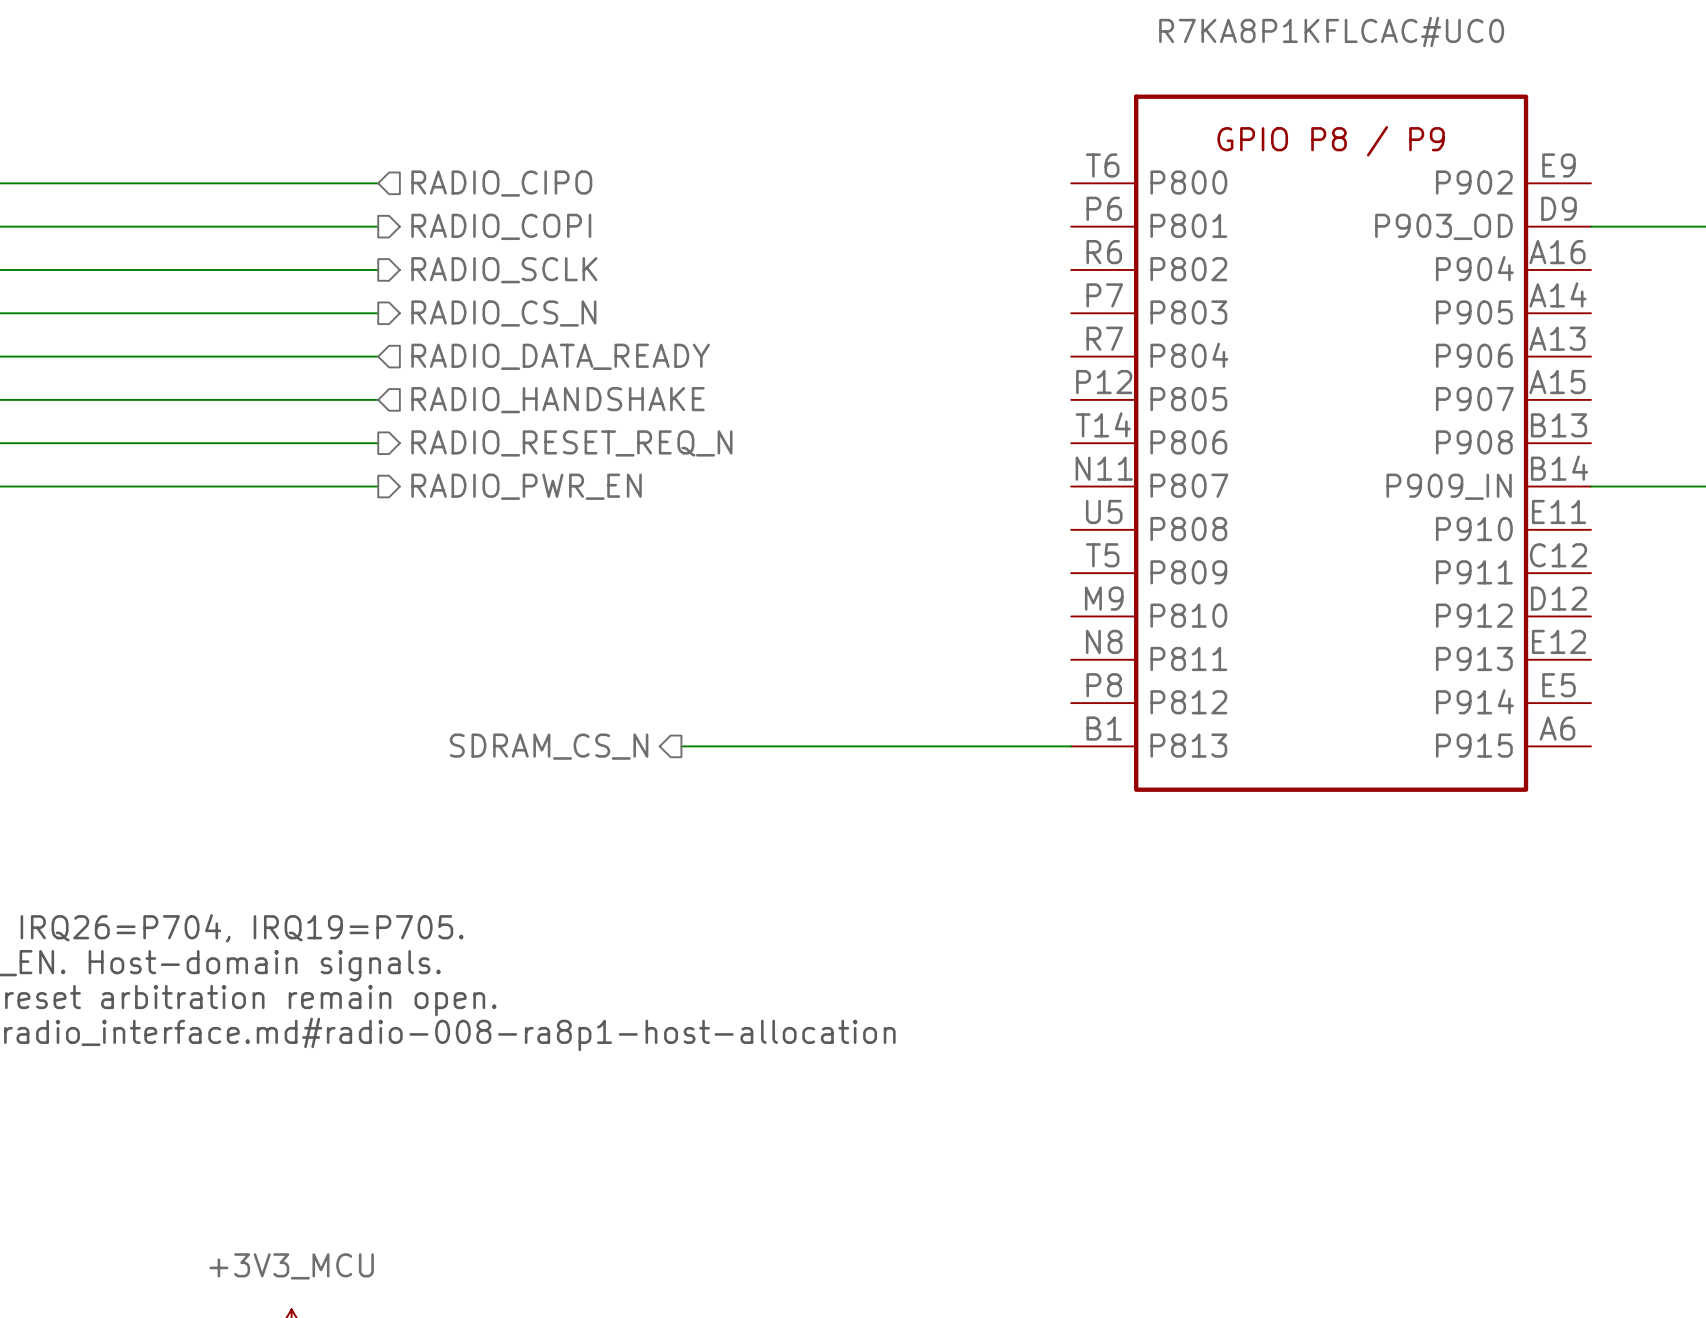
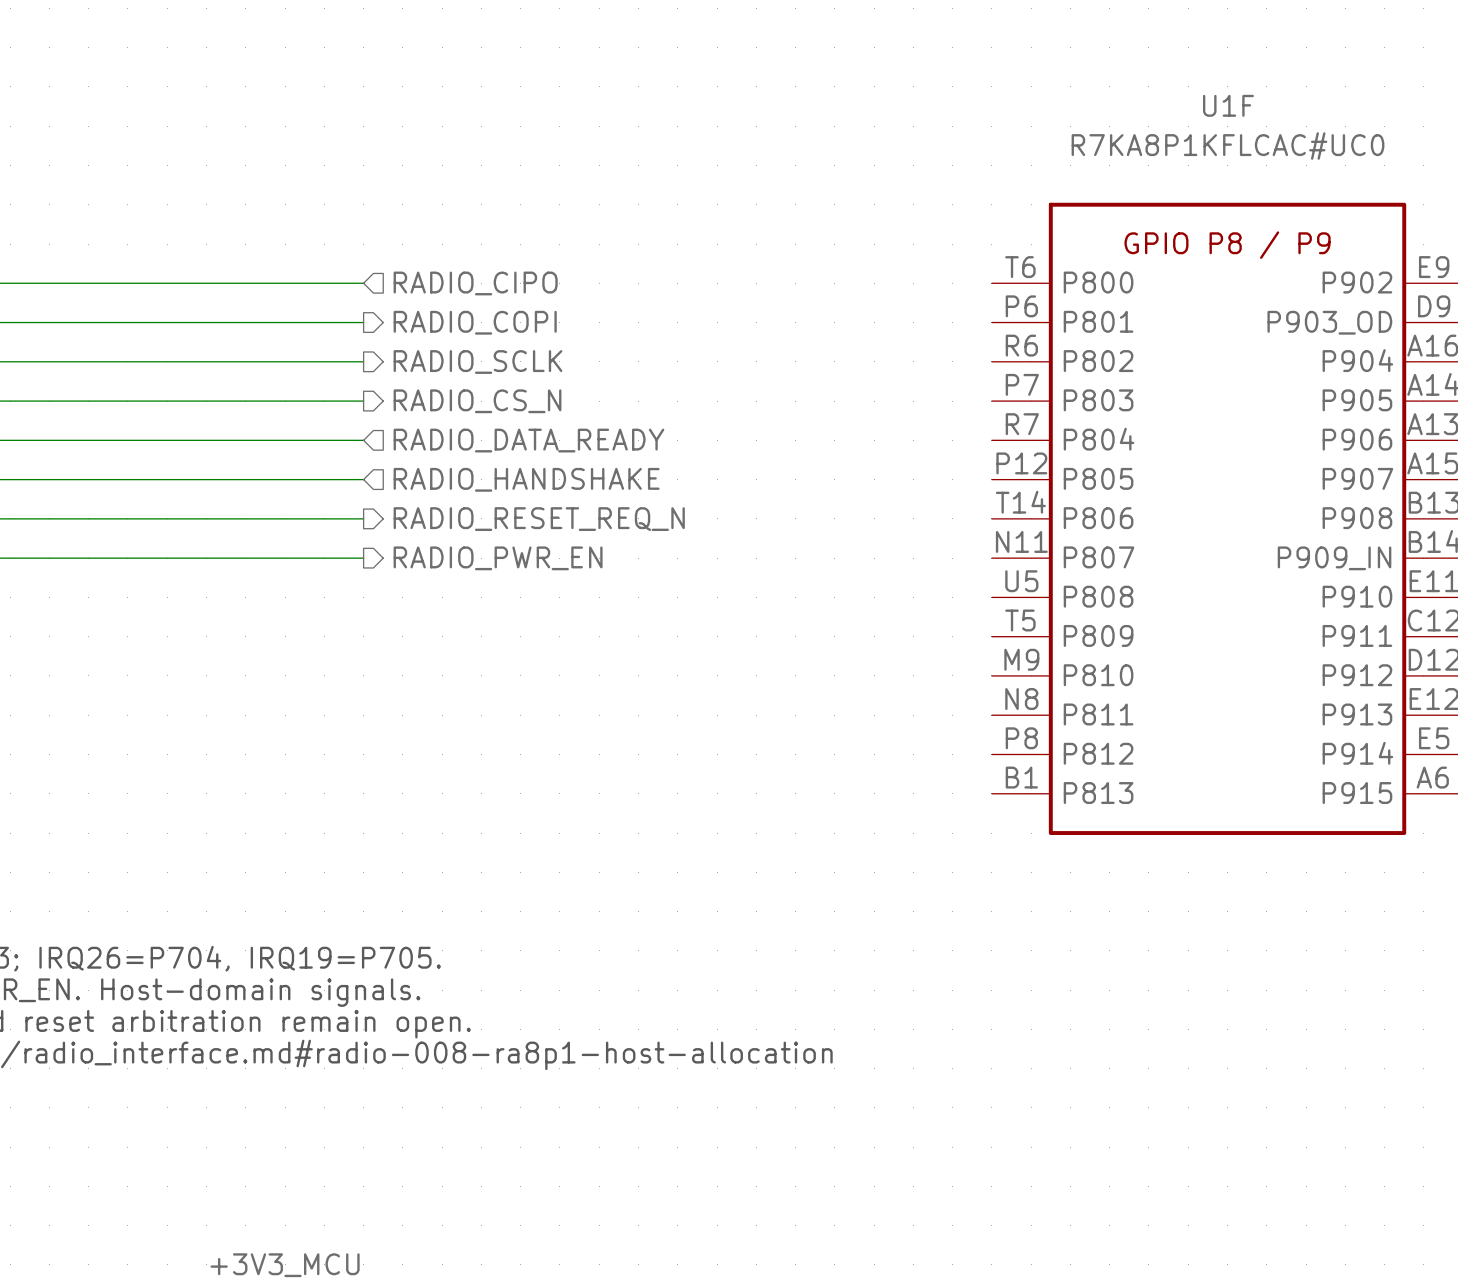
hierarchical label: SDRAM_CS_N (549, 746) -> none
wire: (681, 746) (1071, 746) -> none

